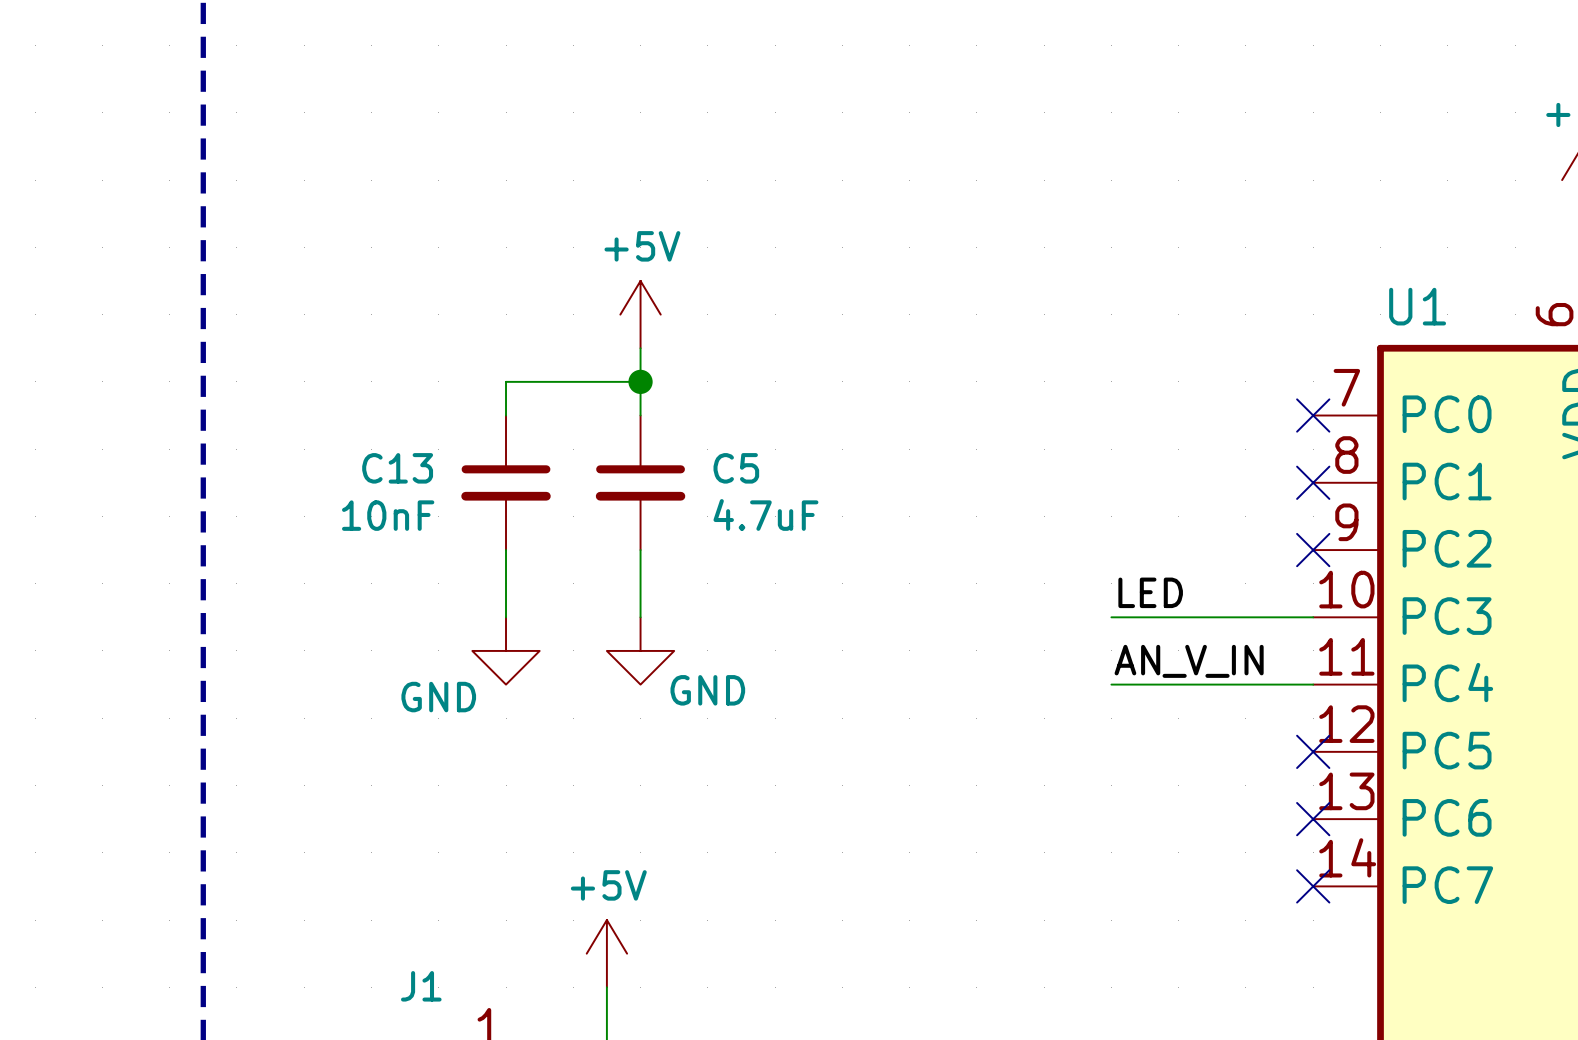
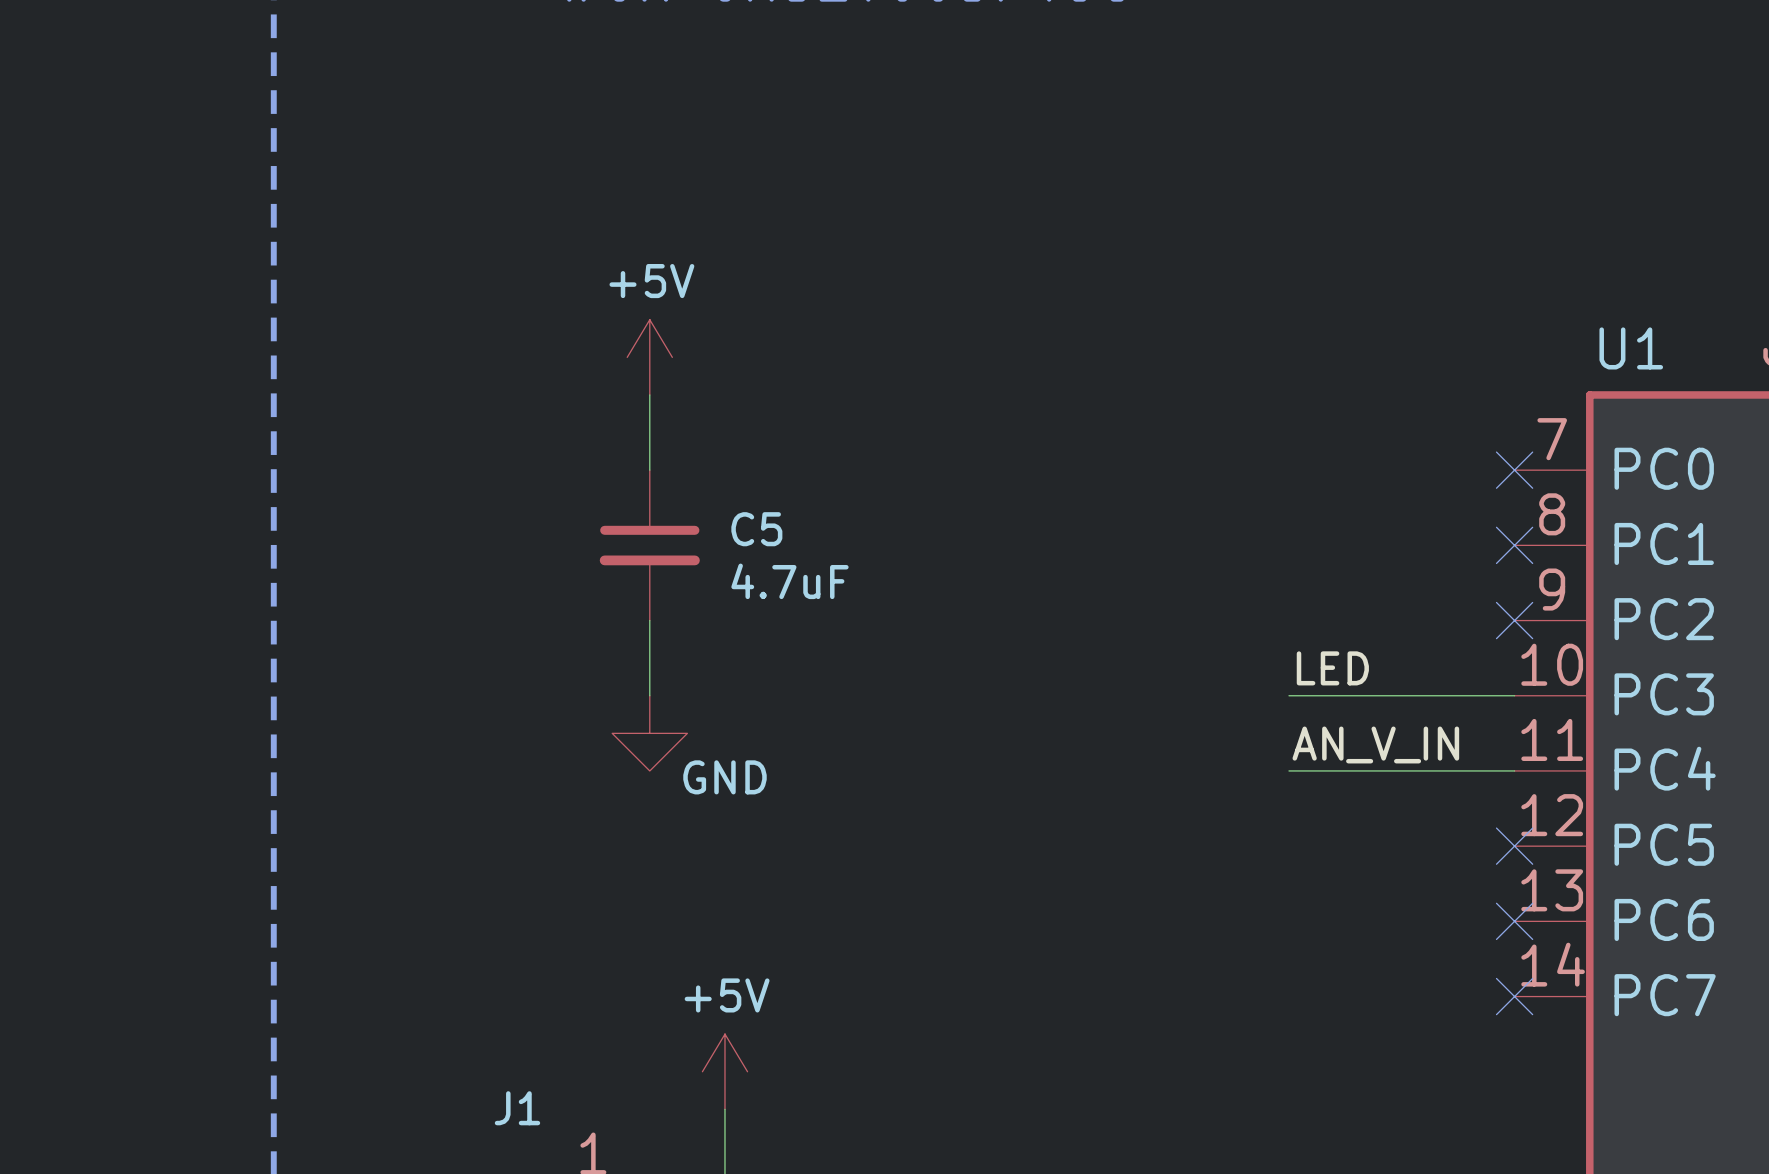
power symbol position: +5V (640, 314) -> +5V (649, 357)
wire: (640, 348) (640, 415) -> (649, 394) (649, 470)
wire: (640, 381) (506, 381) (506, 415) -> none
junction: (640, 381) -> none
C13: 10nF (506, 482) -> none
C5 position: (640, 482) -> (649, 545)
wire: (506, 550) (506, 617) -> none
wire: (640, 550) (640, 617) -> (649, 620) (649, 695)
power symbol position: GND (506, 650) -> GND (649, 733)
power symbol: GND (640, 650) -> none
power symbol text position: GND (438, 697) -> GND (724, 777)

